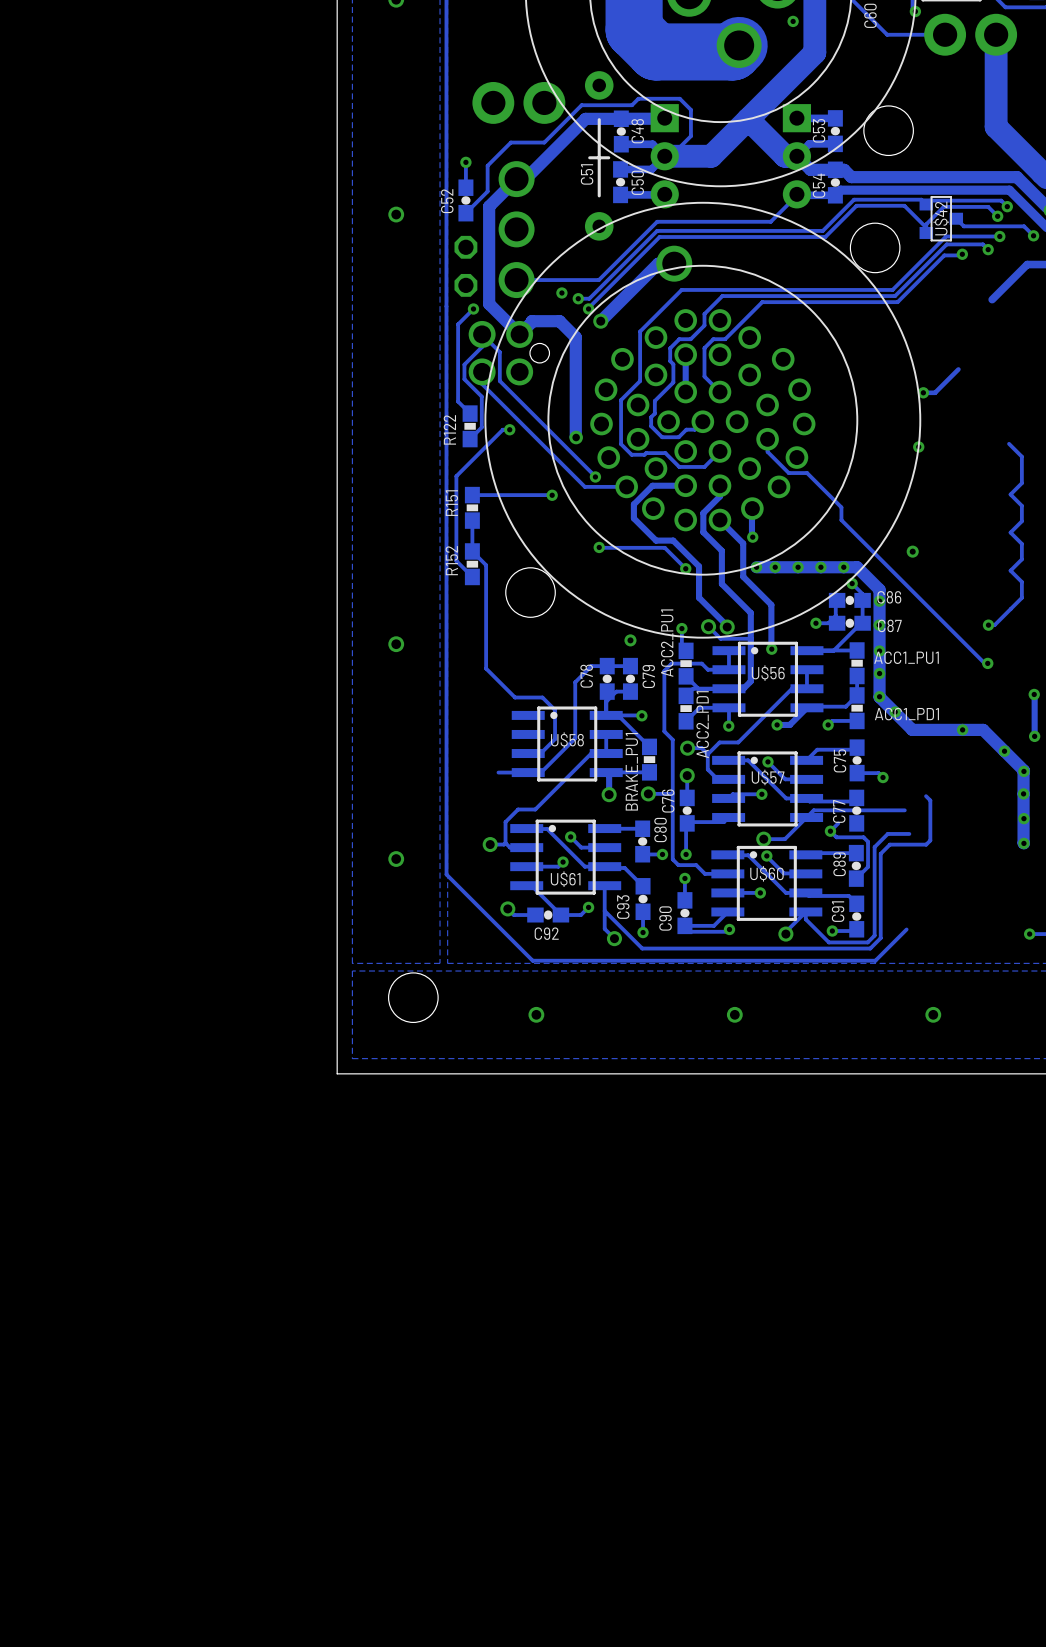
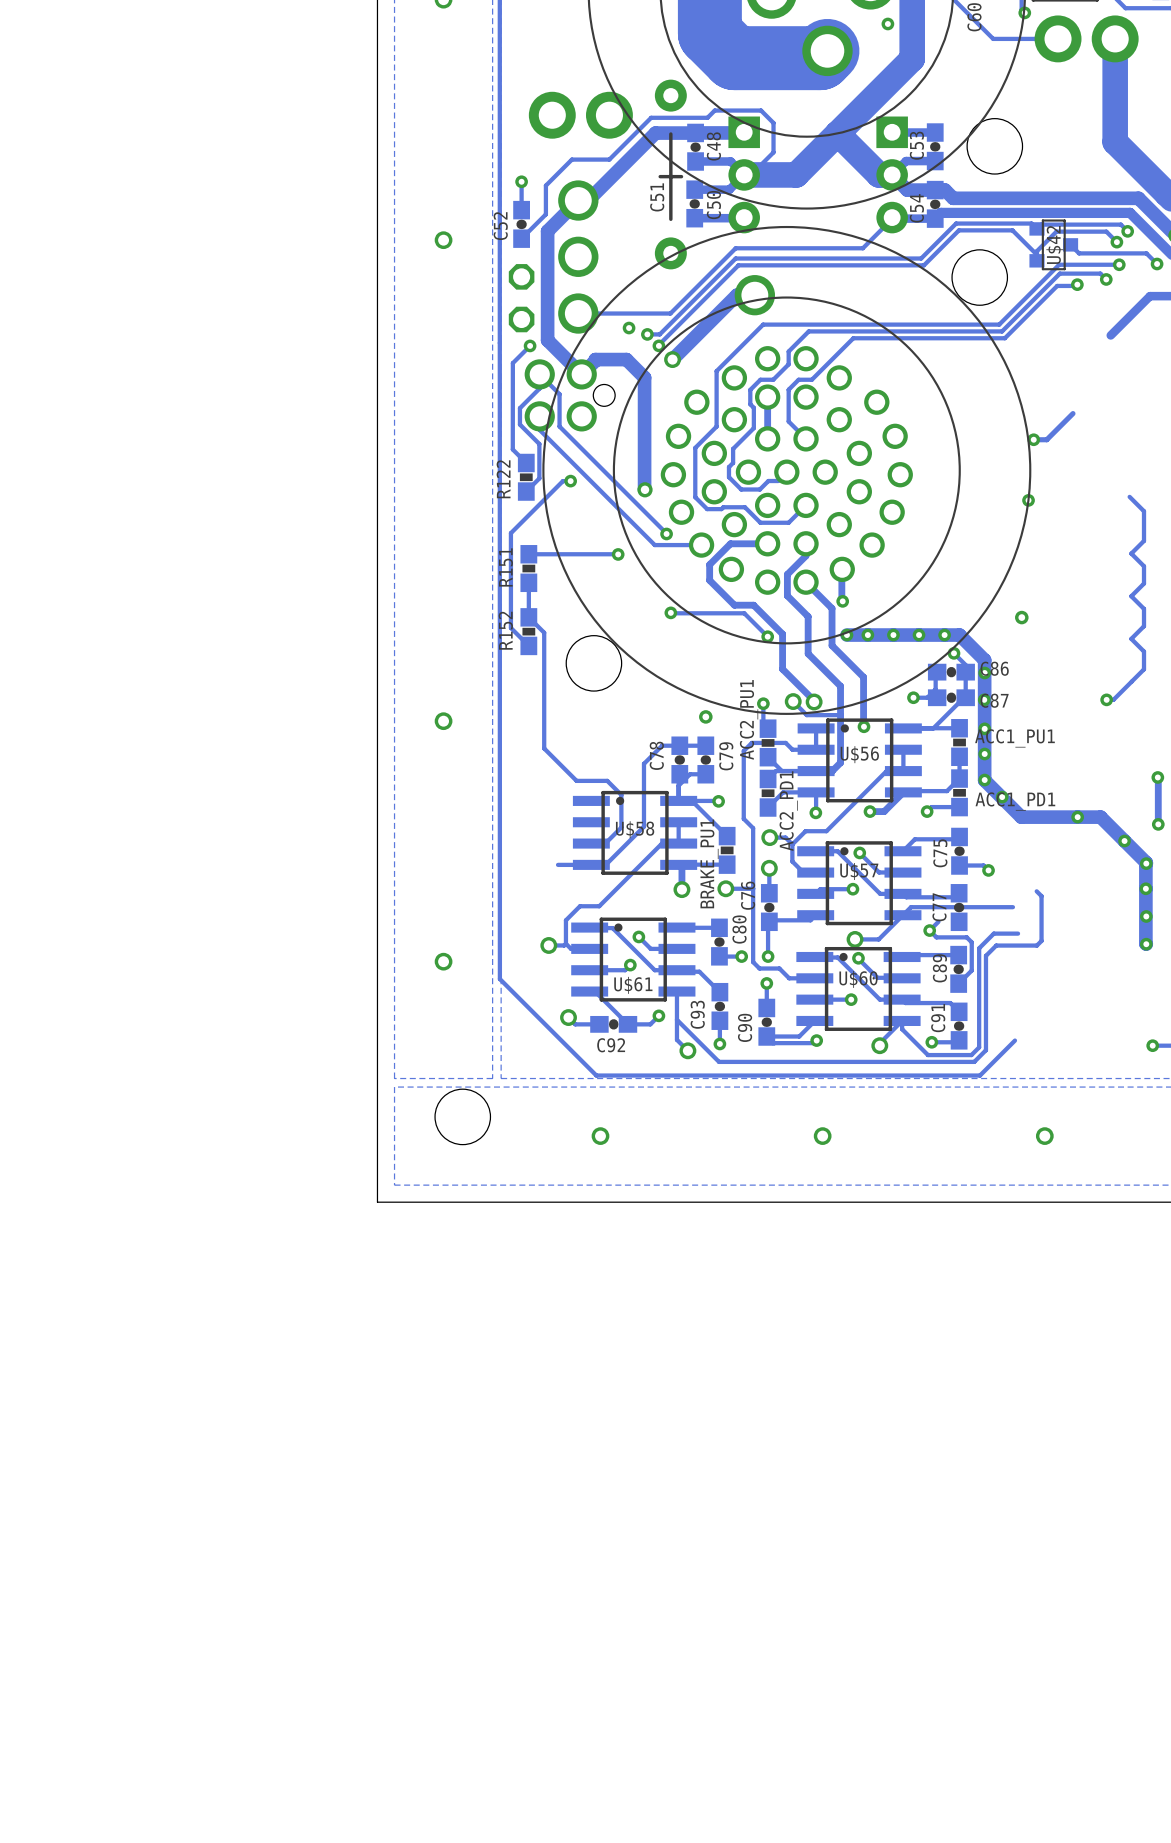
track: (767, 439) (767, 451) (788, 473) (807, 473) (841, 507) (841, 520) (984, 663) (987, 663) -> none
via: (987, 663) -> none

